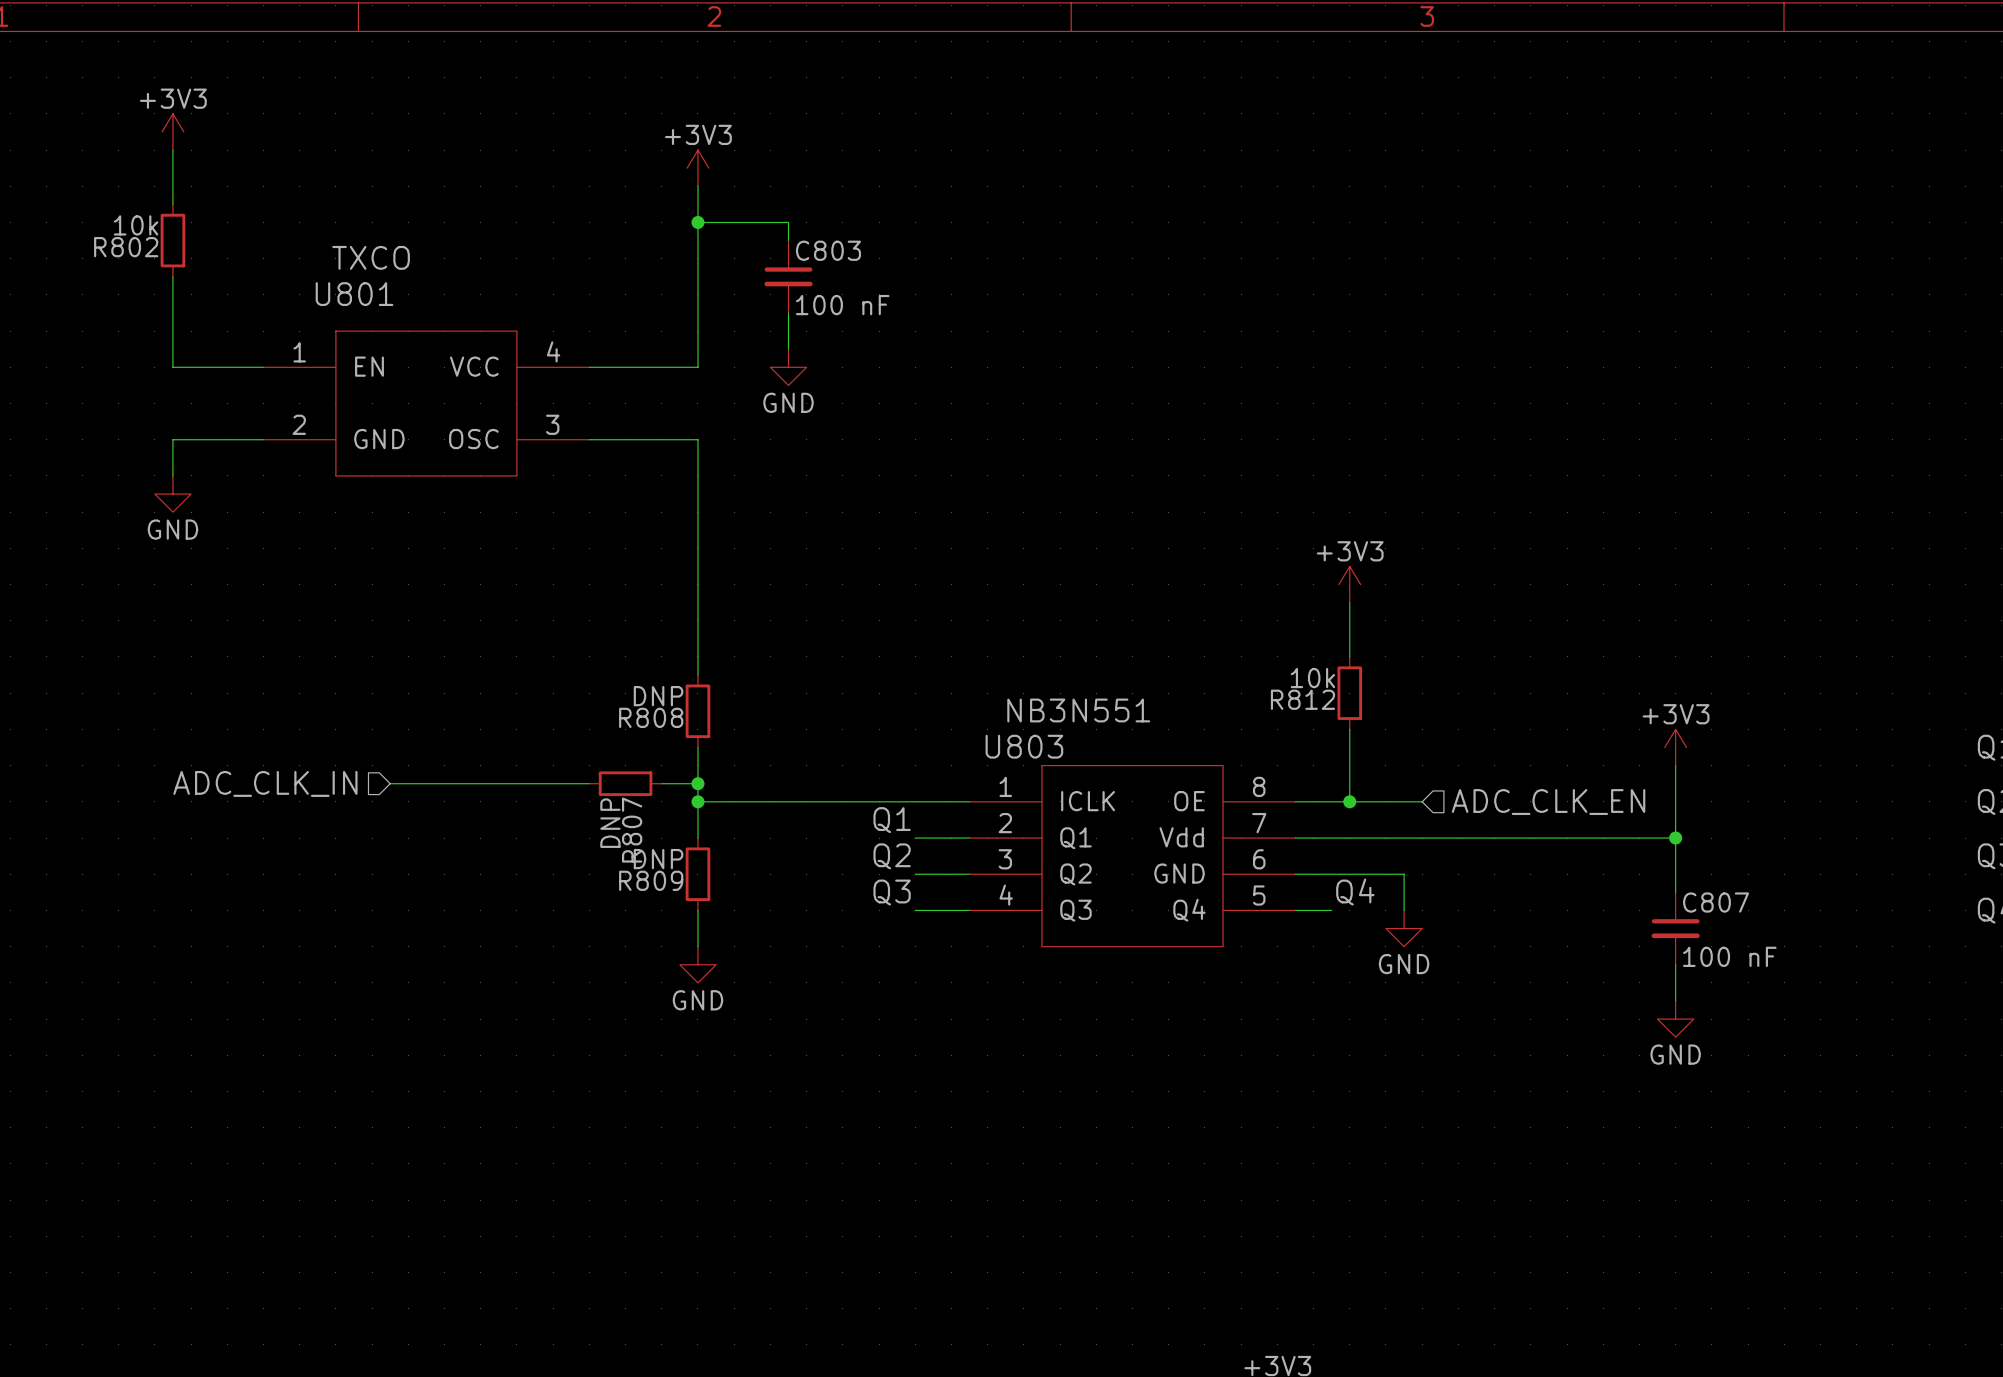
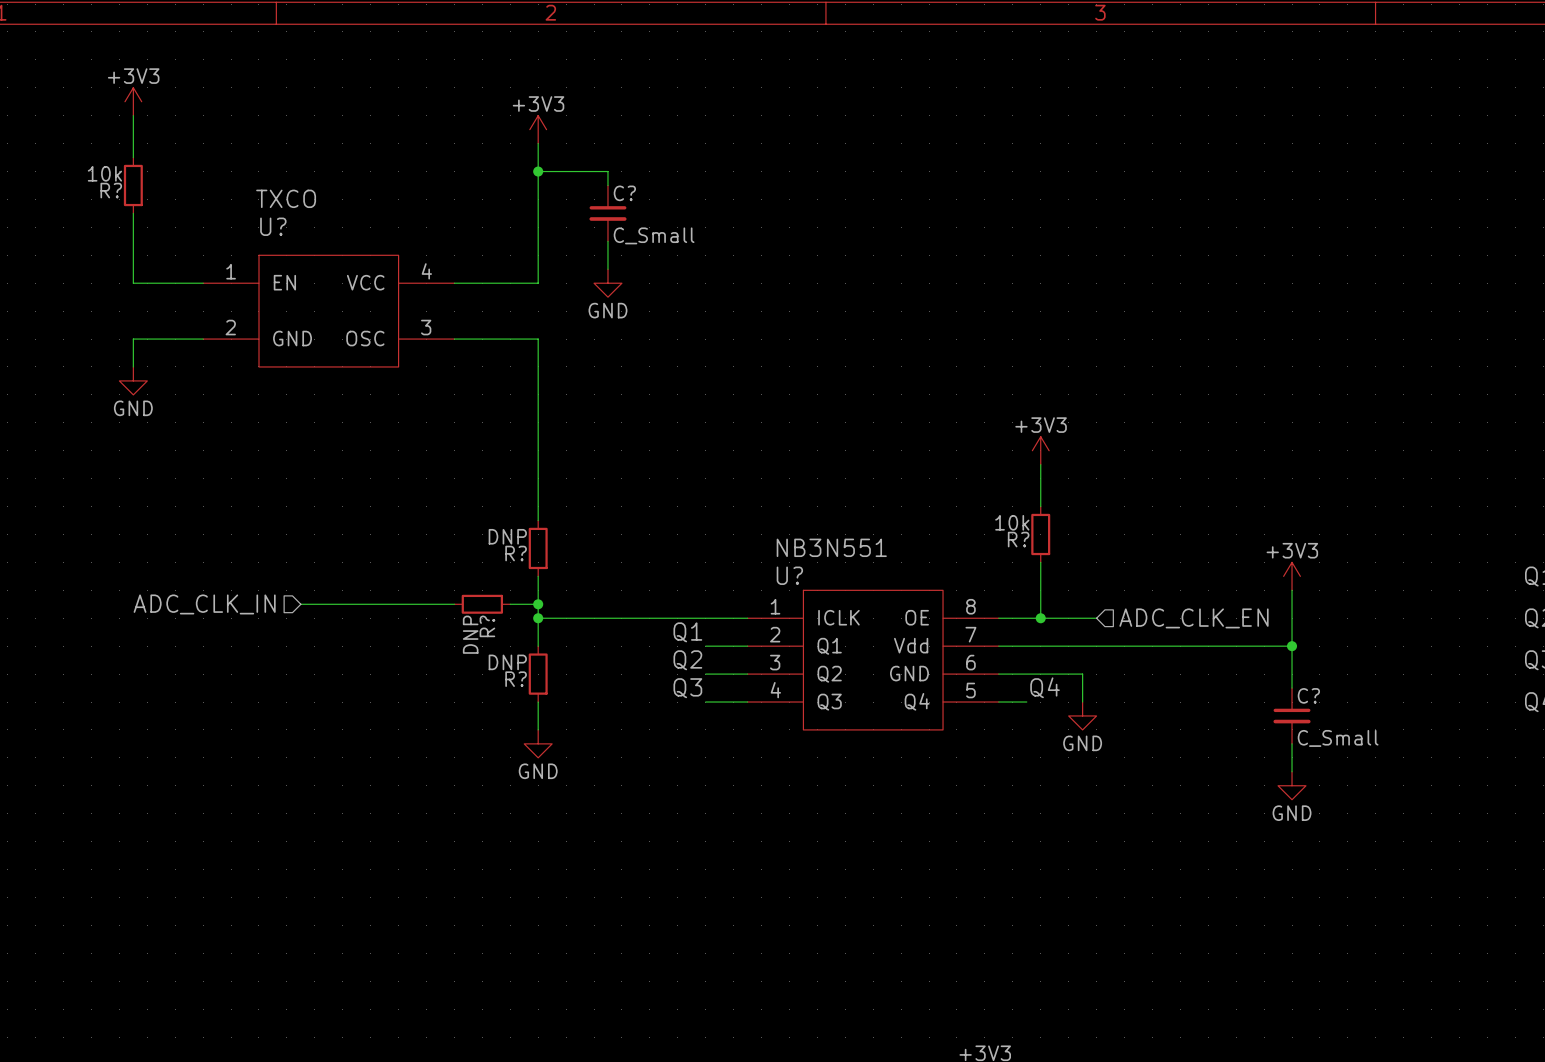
R802 name: R802 (126, 247) -> R? (111, 190)
C803 name: C803 (828, 250) -> C? (624, 193)
U801 name: U801 (354, 294) -> U? (273, 226)
C803 value: 100 nF (842, 305) -> C_Small (654, 235)
R812 name: R812 (1302, 699) -> R? (1018, 539)
R808 name: R808 (651, 717) -> R? (516, 553)
U803 name: U803 (1024, 746) -> U? (789, 575)
R807 name: R807 (632, 830) -> R? (487, 626)
R809 name: R809 (651, 880) -> R? (516, 679)
C807 name: C807 (1716, 902) -> C? (1308, 695)
C807 value: 100 nF (1729, 956) -> C_Small (1338, 738)

